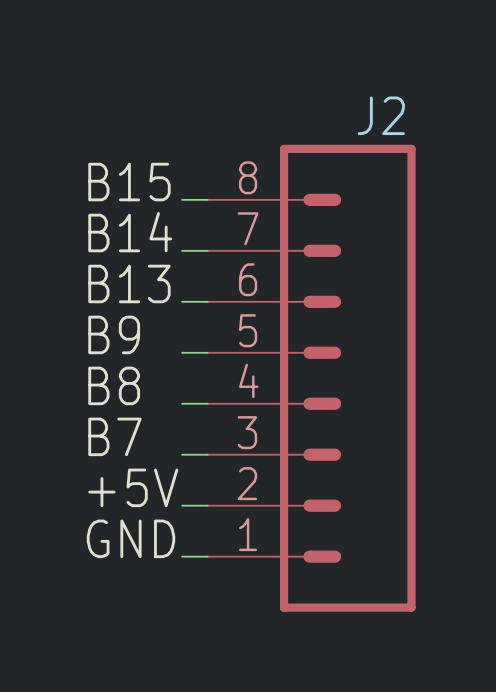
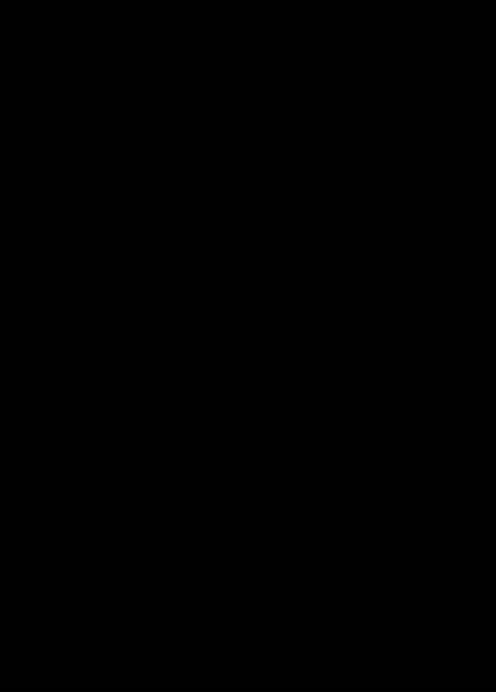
label: B15 (129, 182) -> none
wire: (182, 199) (207, 199) -> none
label: B14 (130, 232) -> none
wire: (182, 250) (207, 250) -> none
label: B13 (129, 283) -> none
wire: (182, 301) (207, 301) -> none
label: B9 (114, 334) -> none
wire: (182, 352) (207, 352) -> none
J2: (311, 378) -> none
label: B8 (114, 385) -> none
wire: (182, 403) (207, 403) -> none
label: B7 (114, 436) -> none
wire: (182, 454) (207, 454) -> none
label: +5V (133, 487) -> none
wire: (182, 505) (207, 505) -> none
label: GND (130, 538) -> none
wire: (182, 556) (207, 556) -> none

